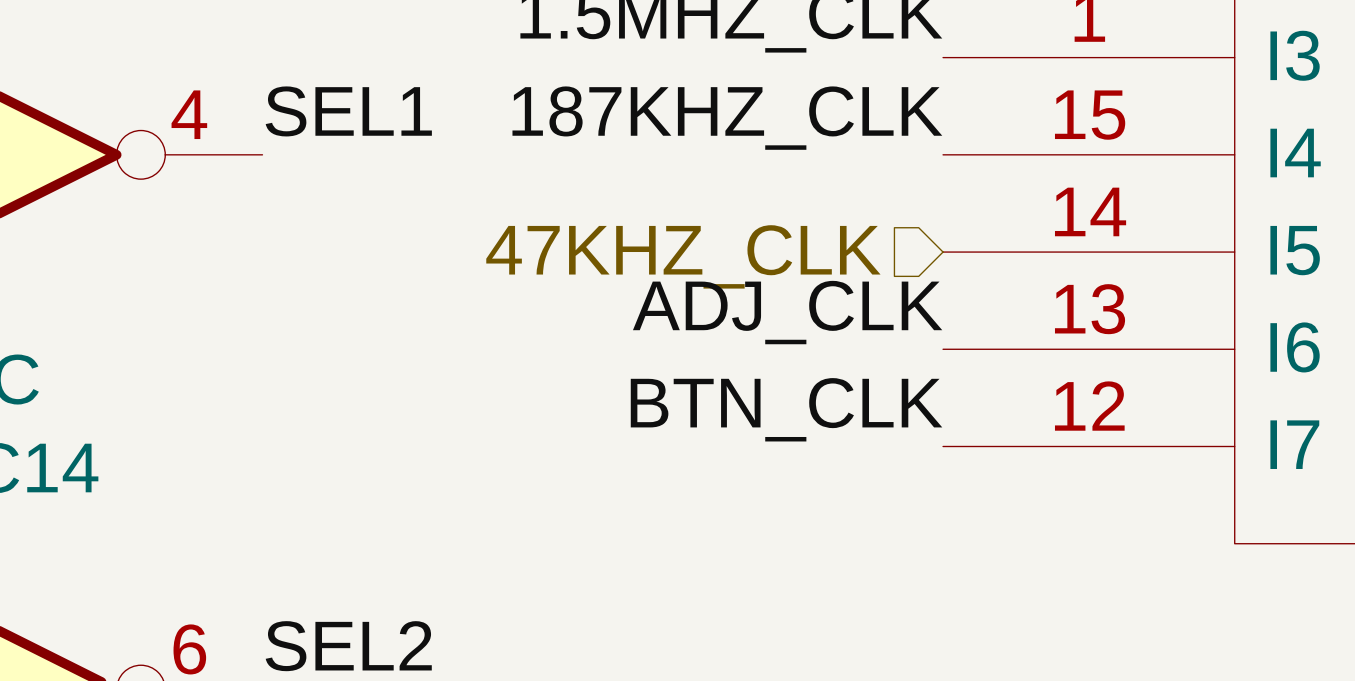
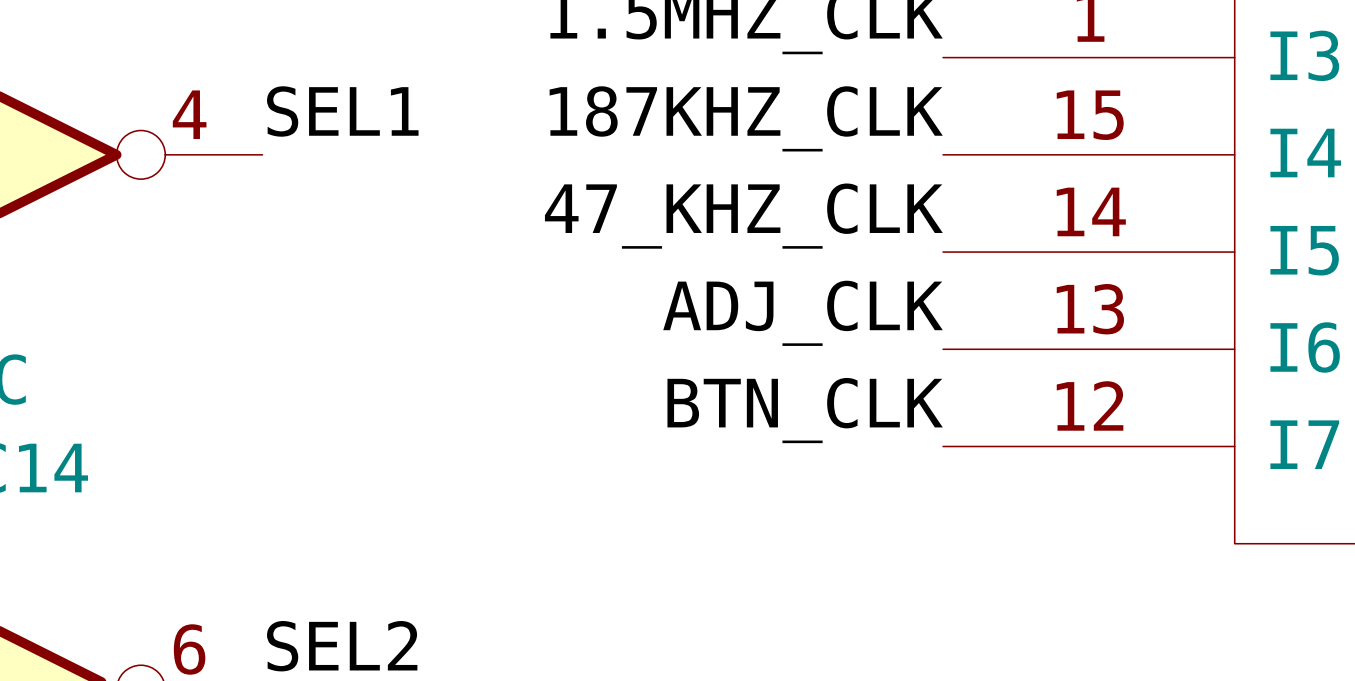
label: none -> 47_KHZ_CLK (743, 216)
hierarchical label: 47KHZ_CLK (683, 256) -> none

